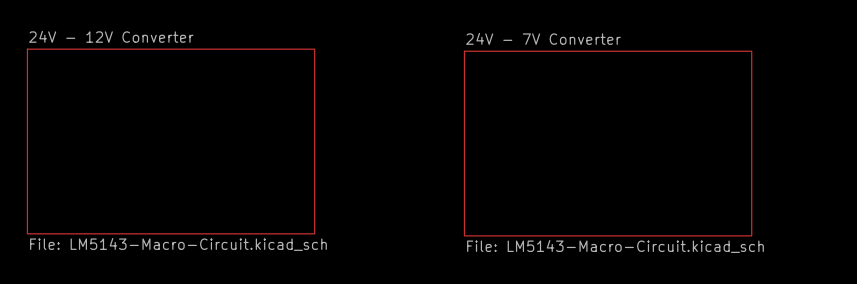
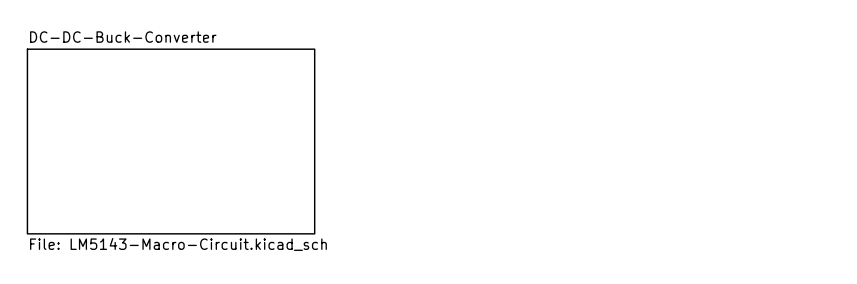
sheet 24V - 12V Converter name: 24V - 12V Converter (111, 36) -> DC-DC-Buck-Converter (123, 37)
sheet 24V - 7V Converter: File: LM5143-Macro-Circuit.kicad_sch (608, 143) -> none

